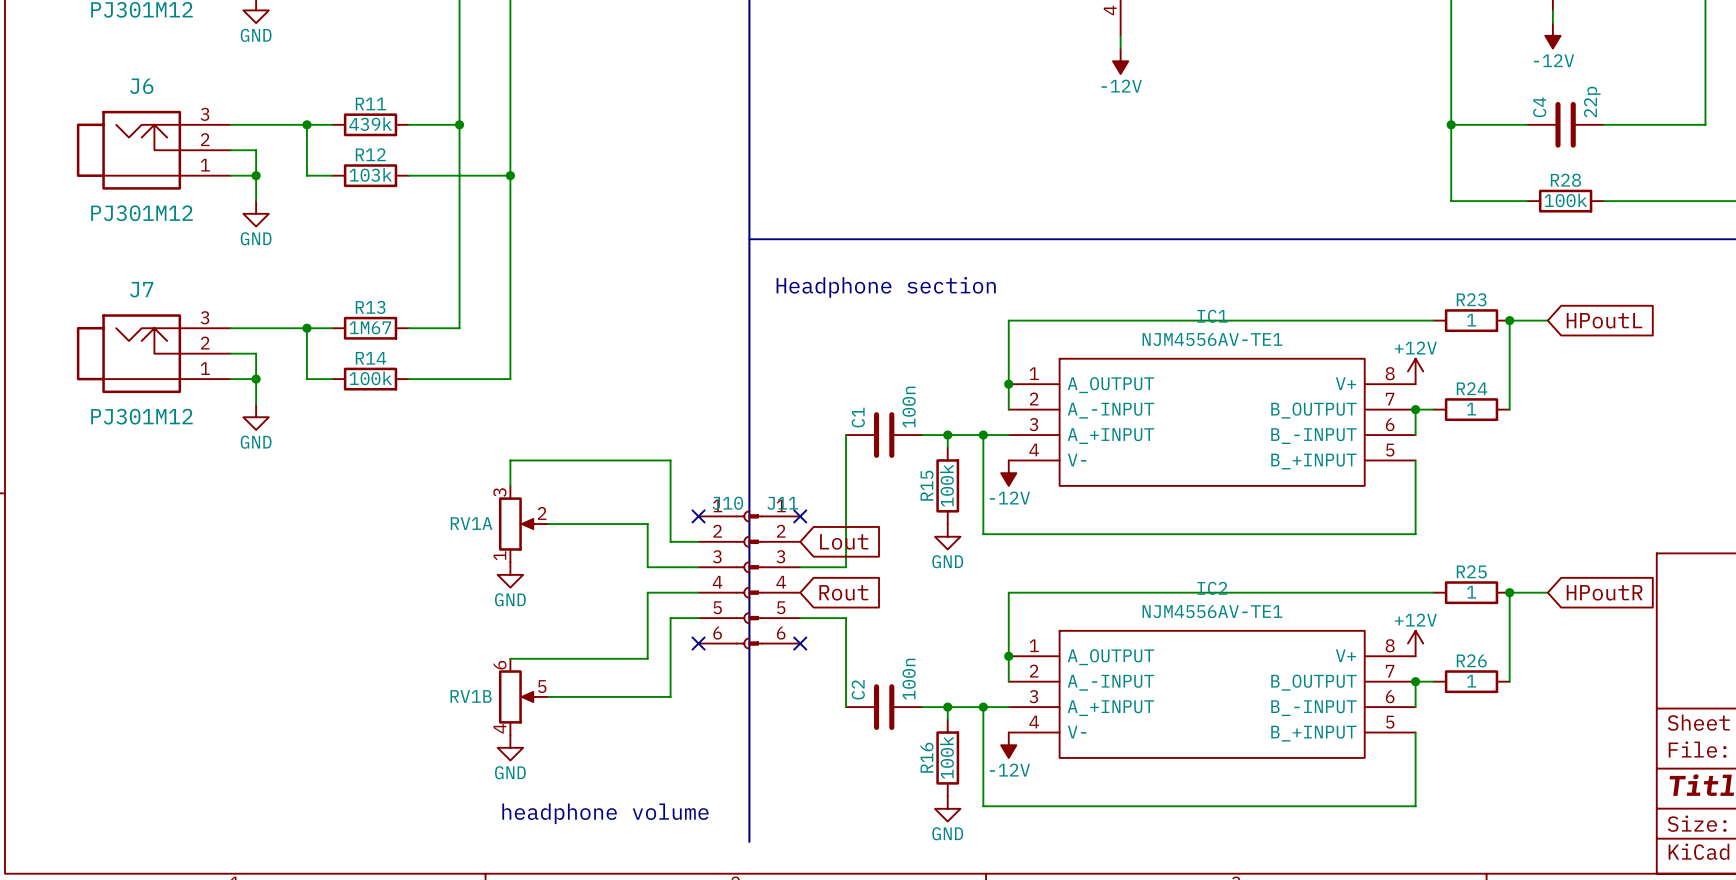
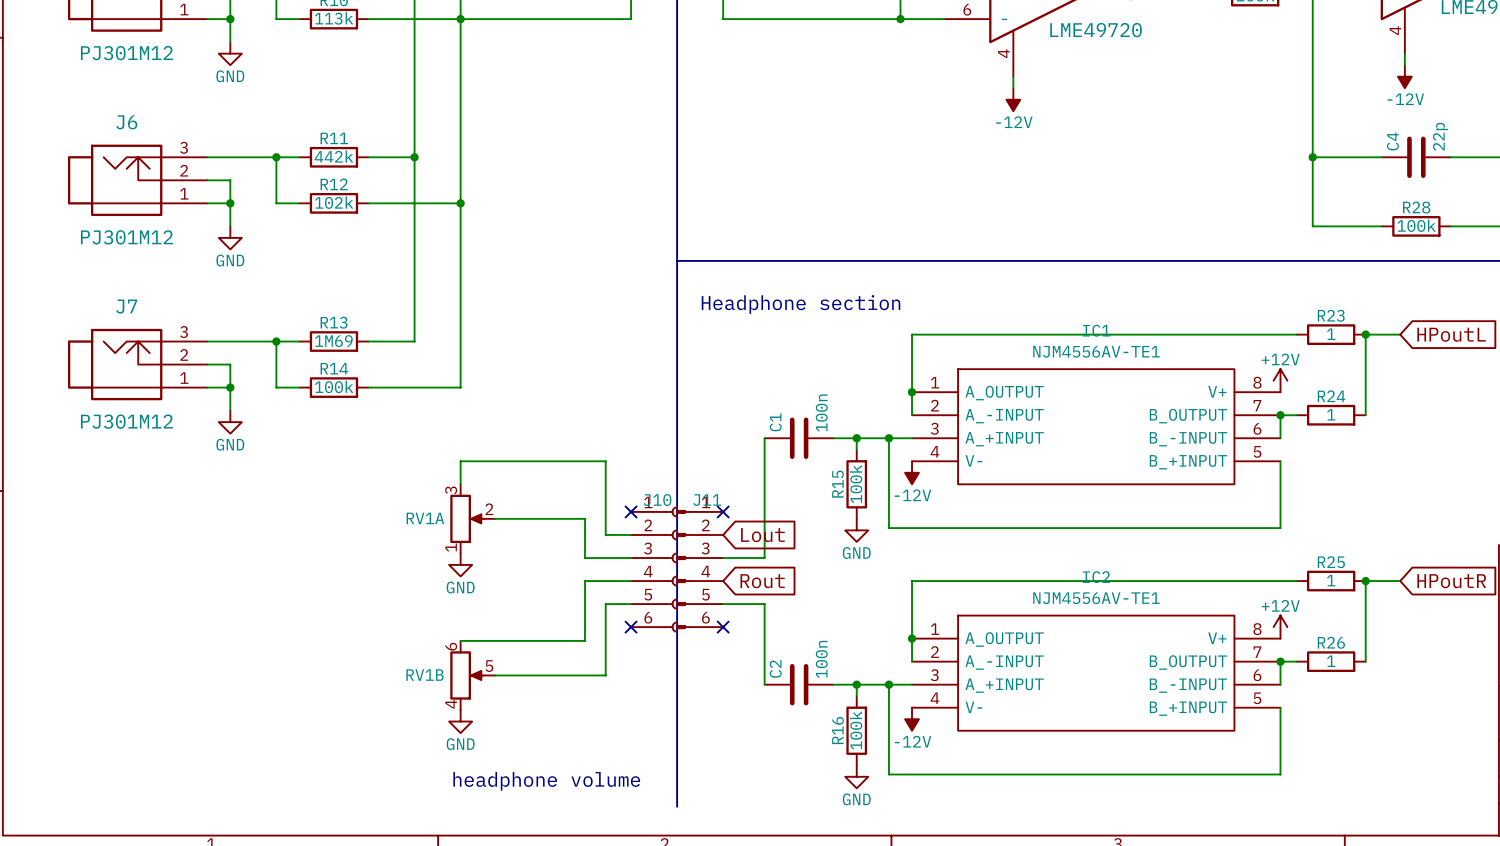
R11 value: 439k (370, 124) -> 442k (334, 156)
R12 value: 103k (370, 174) -> 102k (334, 202)
R13 value: 1M67 (370, 327) -> 1M69 (333, 341)

